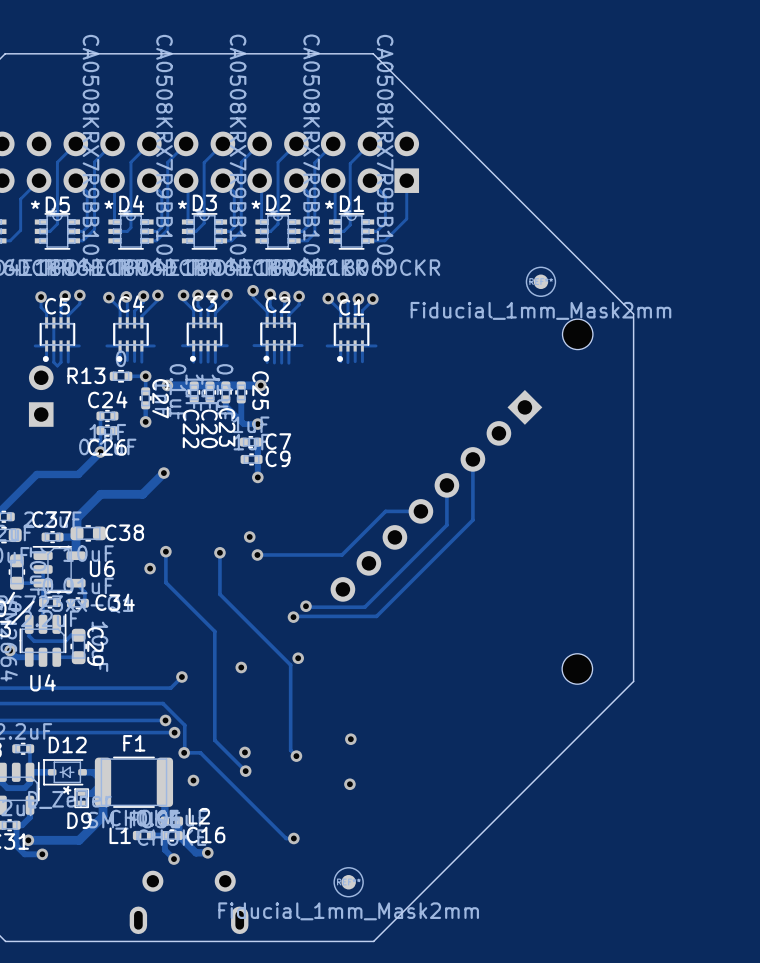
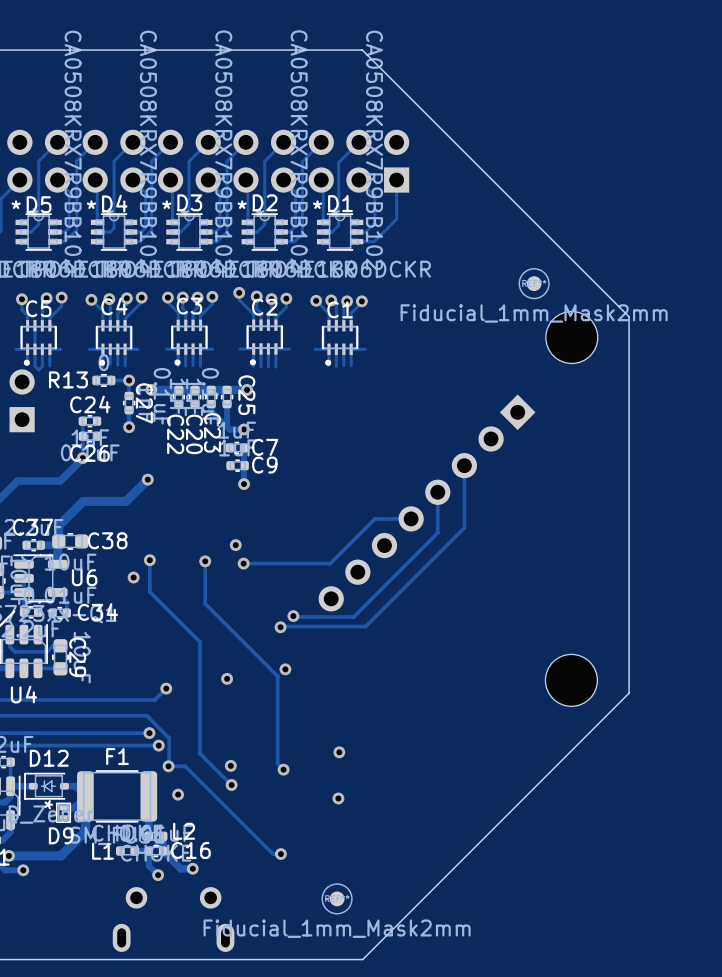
part footprint: [562, 319, 593, 350] -> [545, 311, 598, 364]
part footprint: [562, 653, 593, 685] -> [545, 654, 598, 707]

